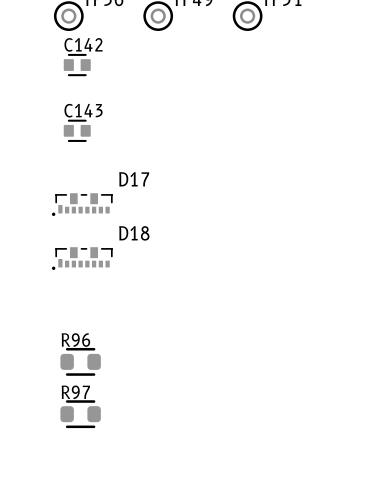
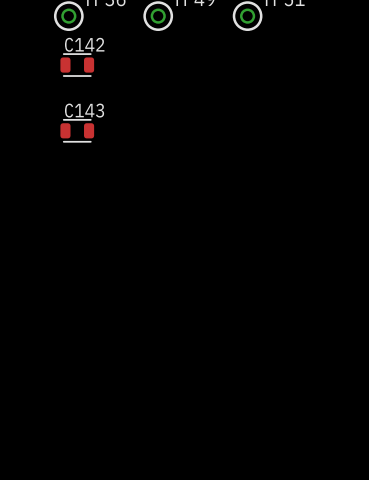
C142 footprint: [63, 53, 91, 77] -> [60, 53, 95, 77]
C143 footprint: [63, 119, 91, 142] -> [60, 119, 95, 143]
D17: (82, 204) -> none
D18: (82, 258) -> none
R96: (80, 361) -> none
R97: (80, 414) -> none

